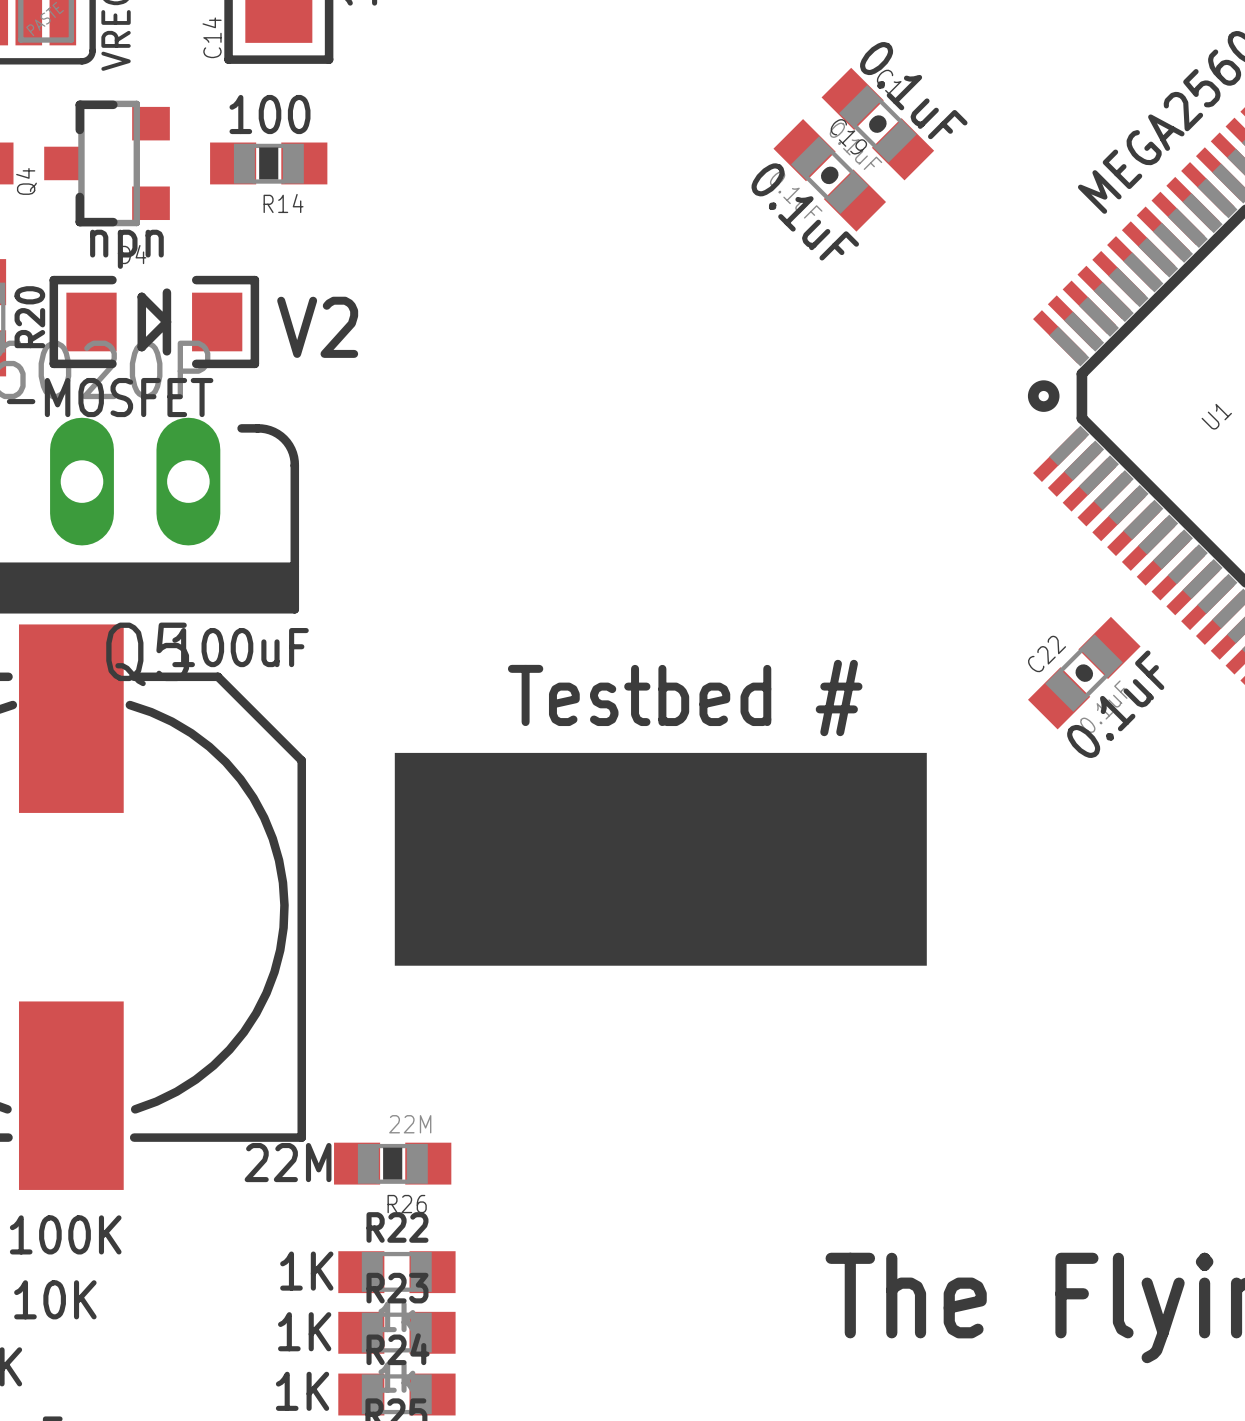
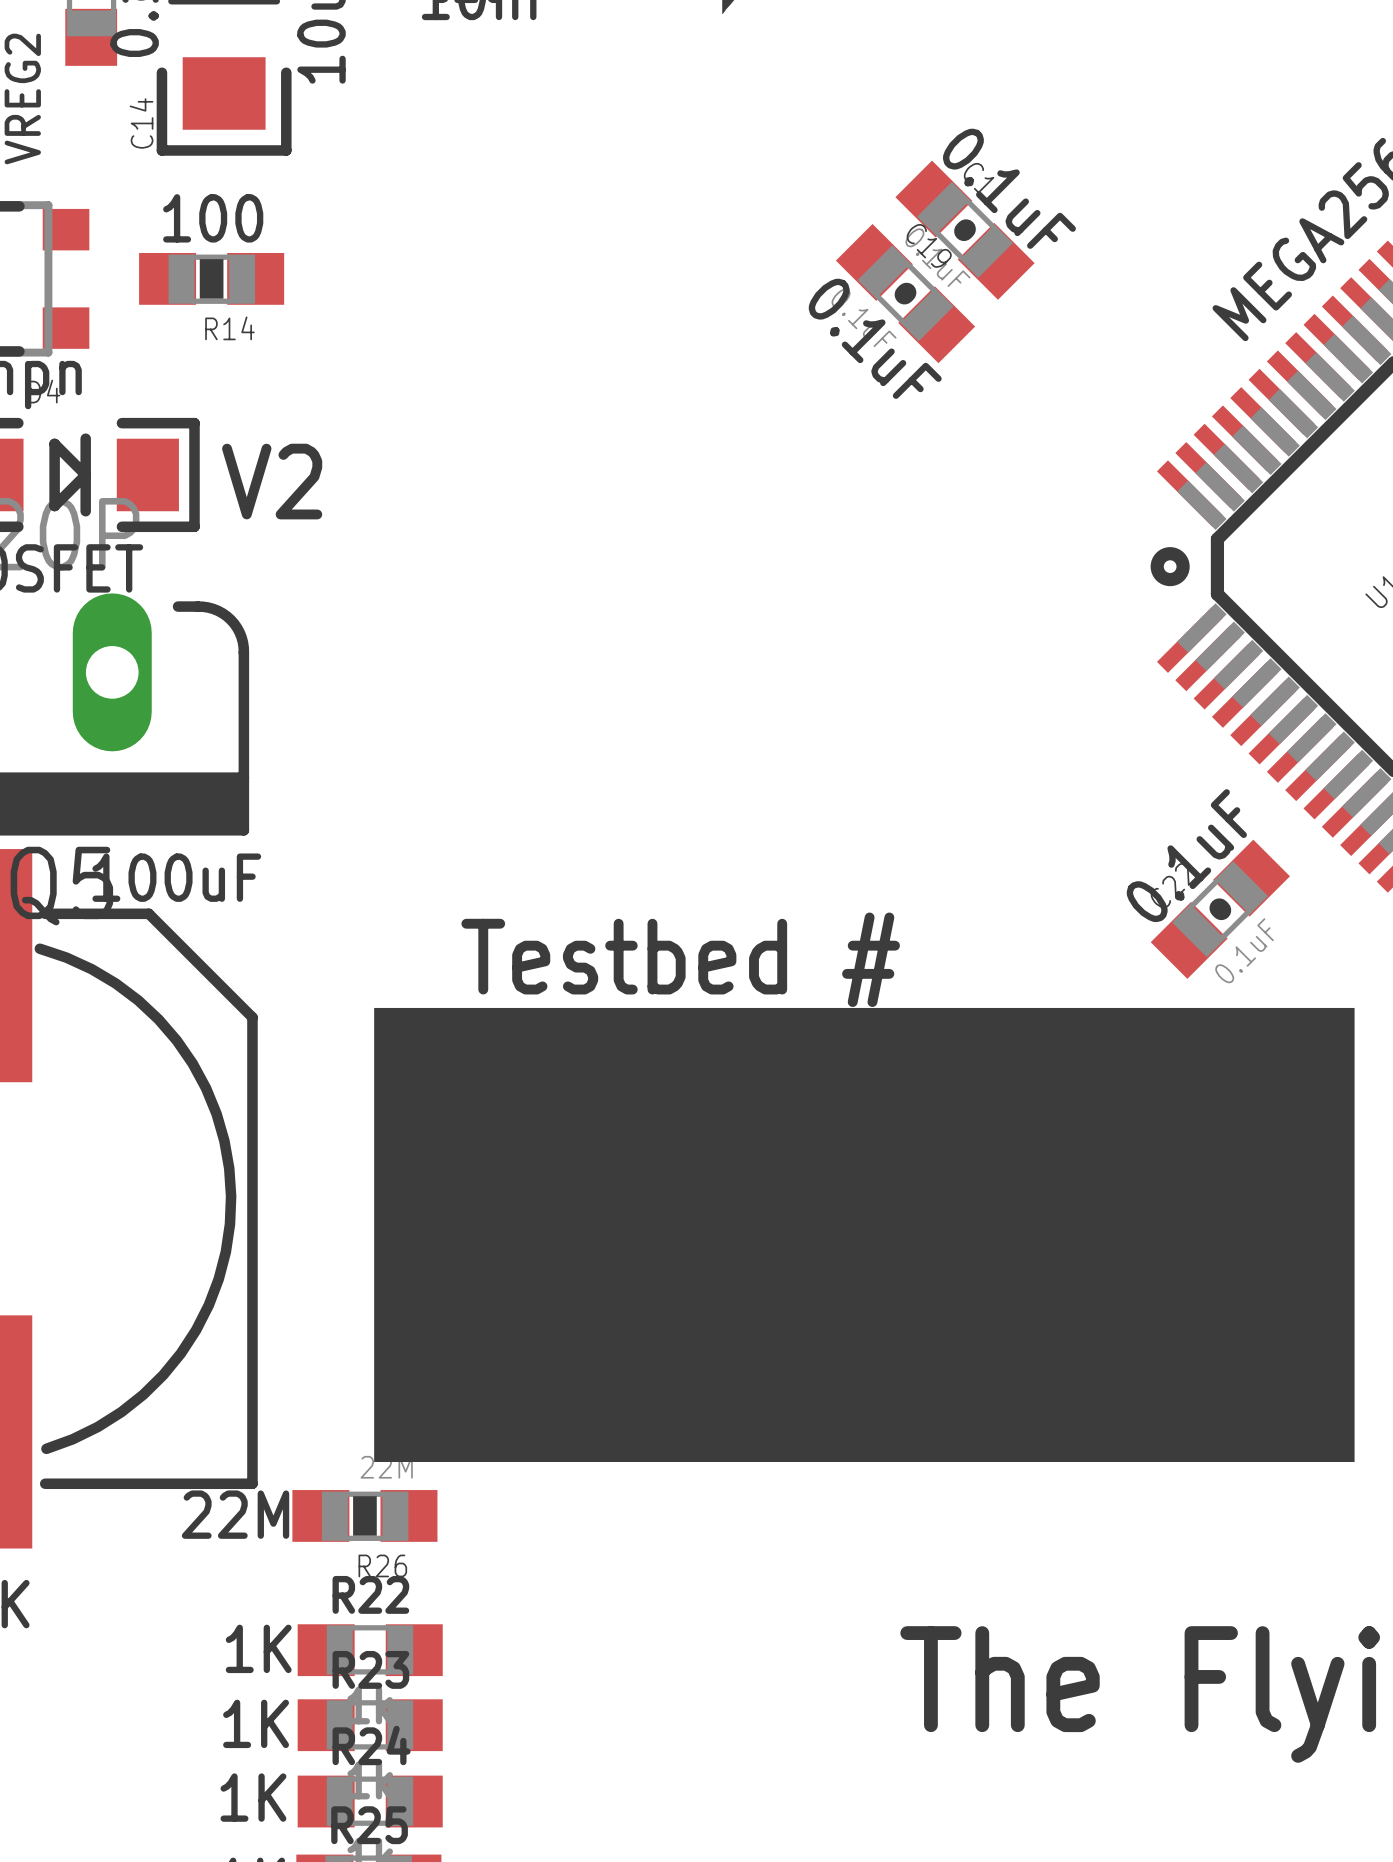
text position: Testbed # (685, 697) -> Testbed # (680, 959)
text position: 0.1uF (1115, 704) -> 0.1uF (1186, 855)
drawing: [394, 752, 927, 966] -> none
drawing: none -> [374, 1007, 1355, 1462]

